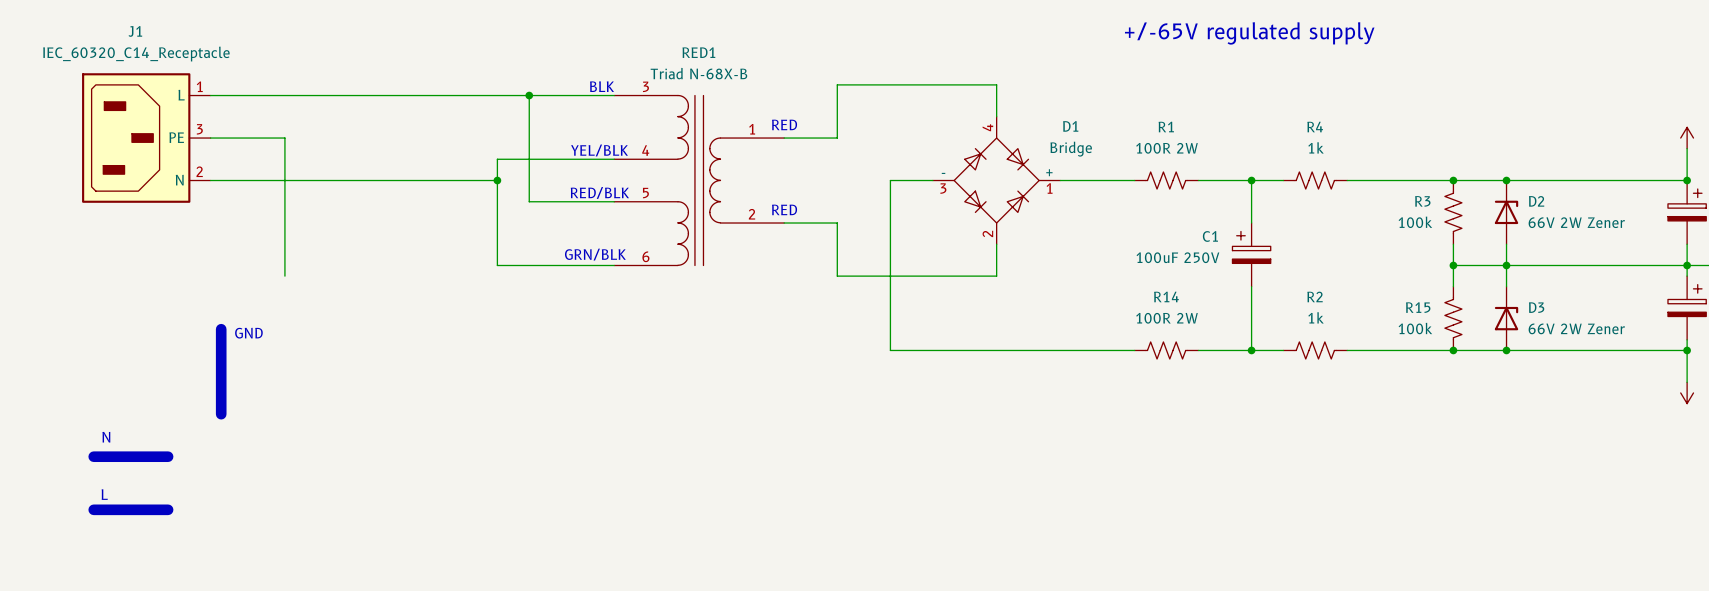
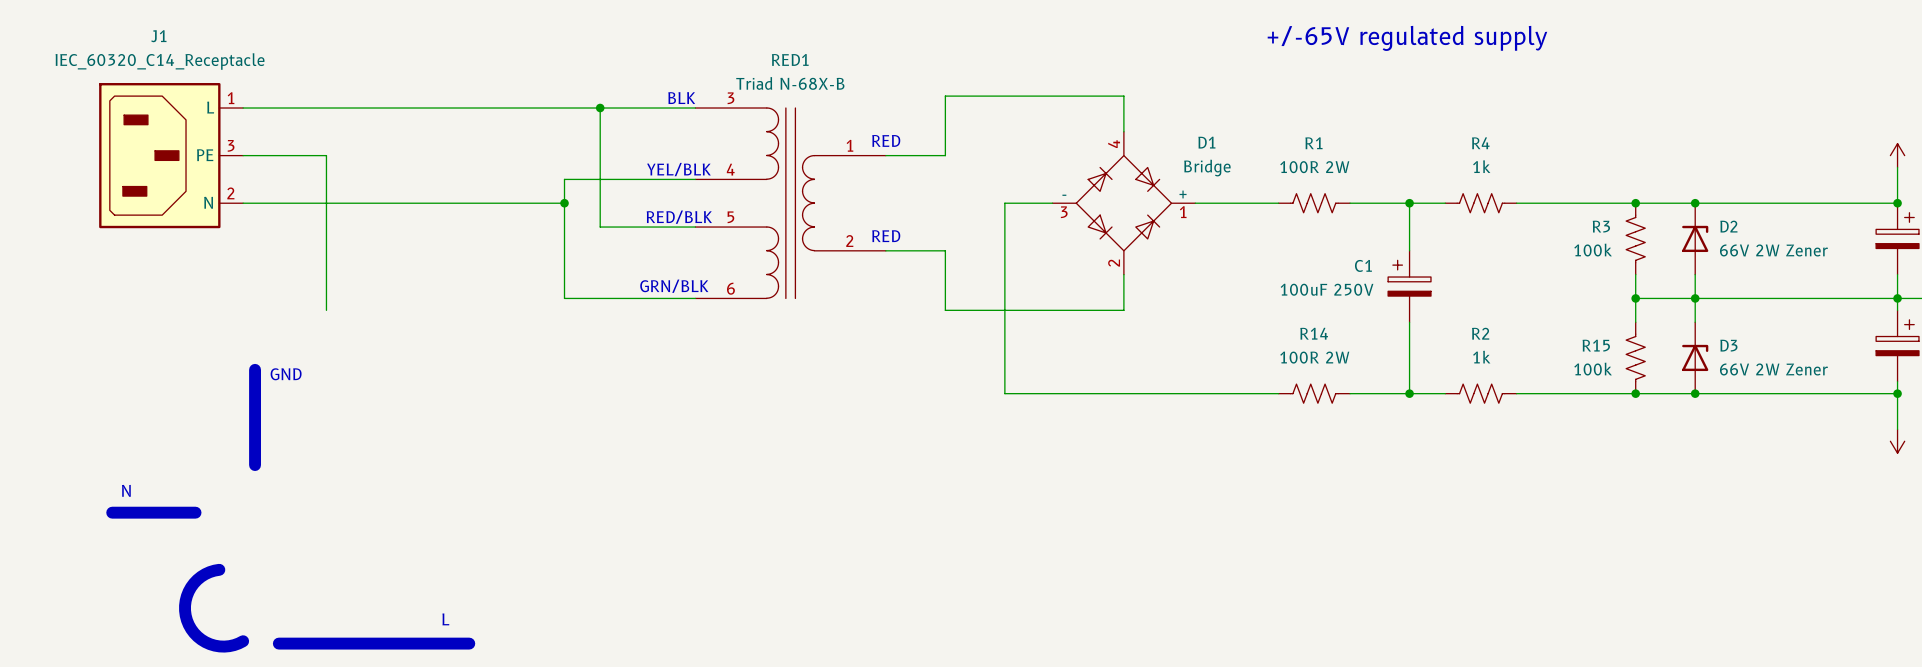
text: L (104, 494) -> none
line: none -> (219, 569) (205, 574) (191, 587) (185, 605) (186, 620) (194, 633) (210, 644) (229, 646) (243, 641)
line: (93, 509) (168, 509) -> none
text: none -> L (445, 619)
line: none -> (278, 643) (469, 643)

